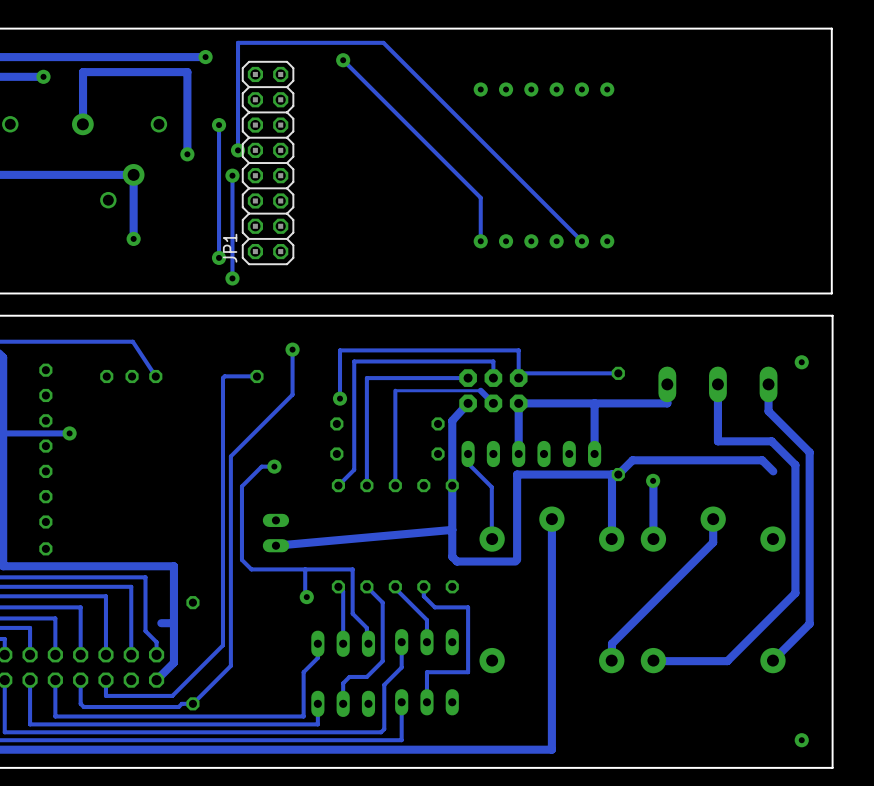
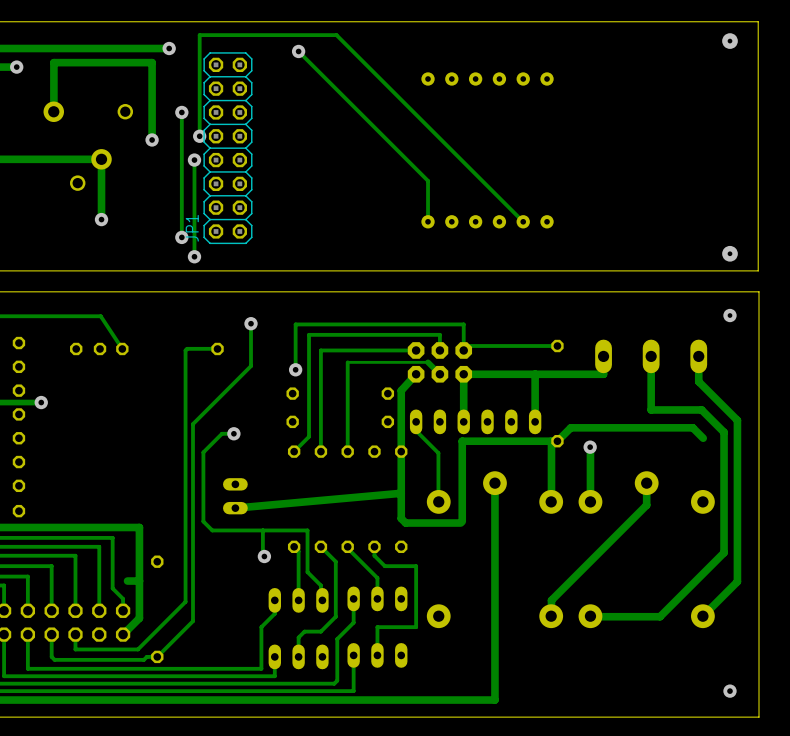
via: none -> (729, 41)
via: none -> (729, 253)
via: none -> (729, 315)
via: (801, 362) -> none

